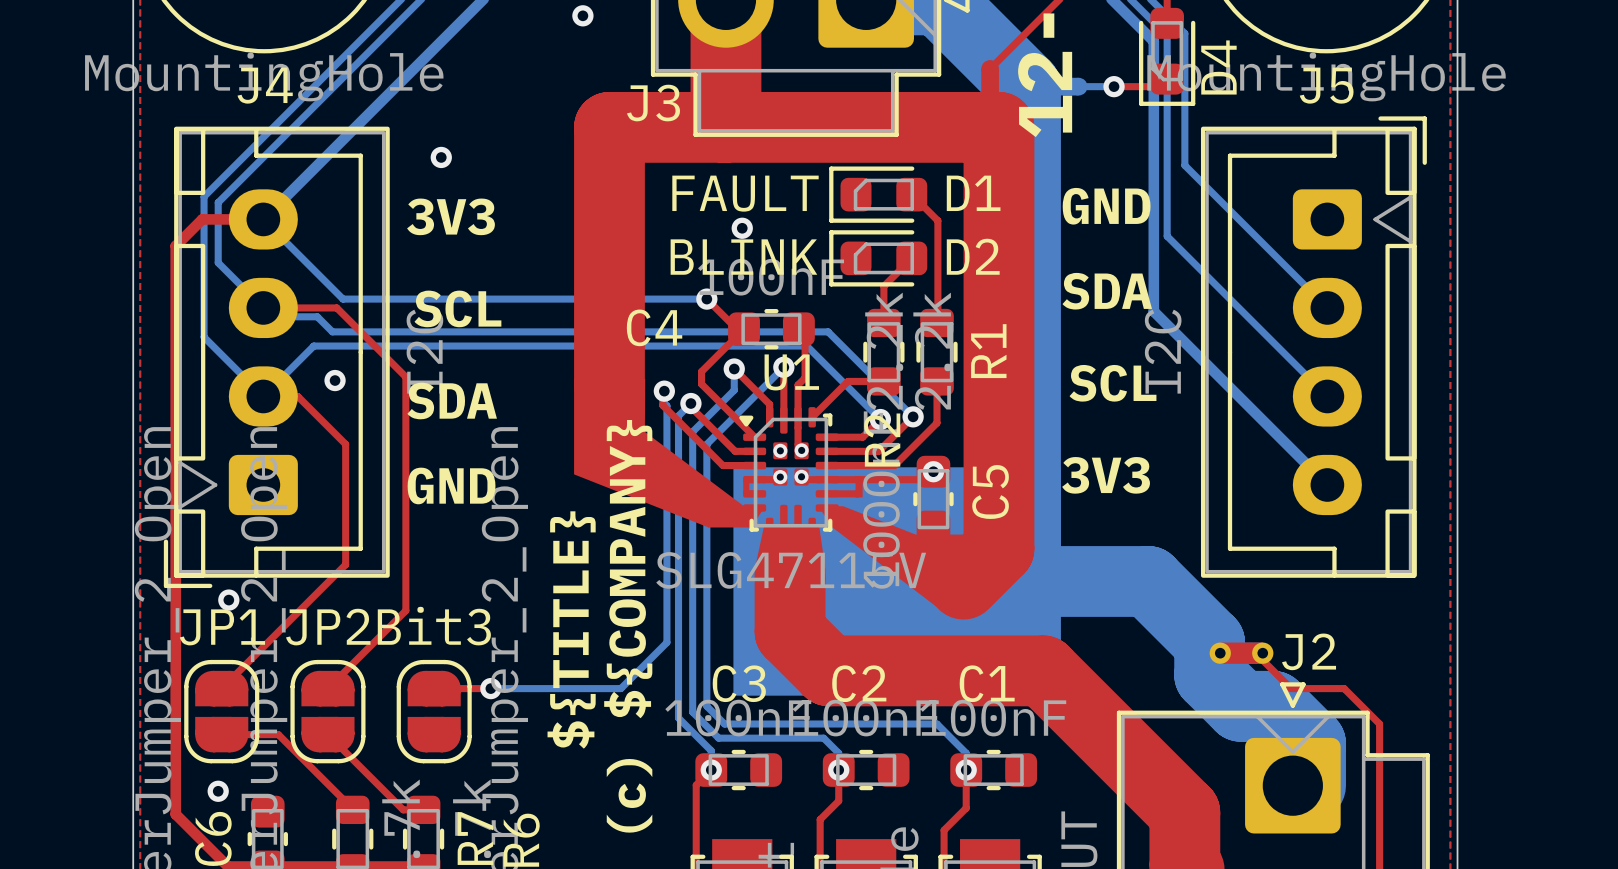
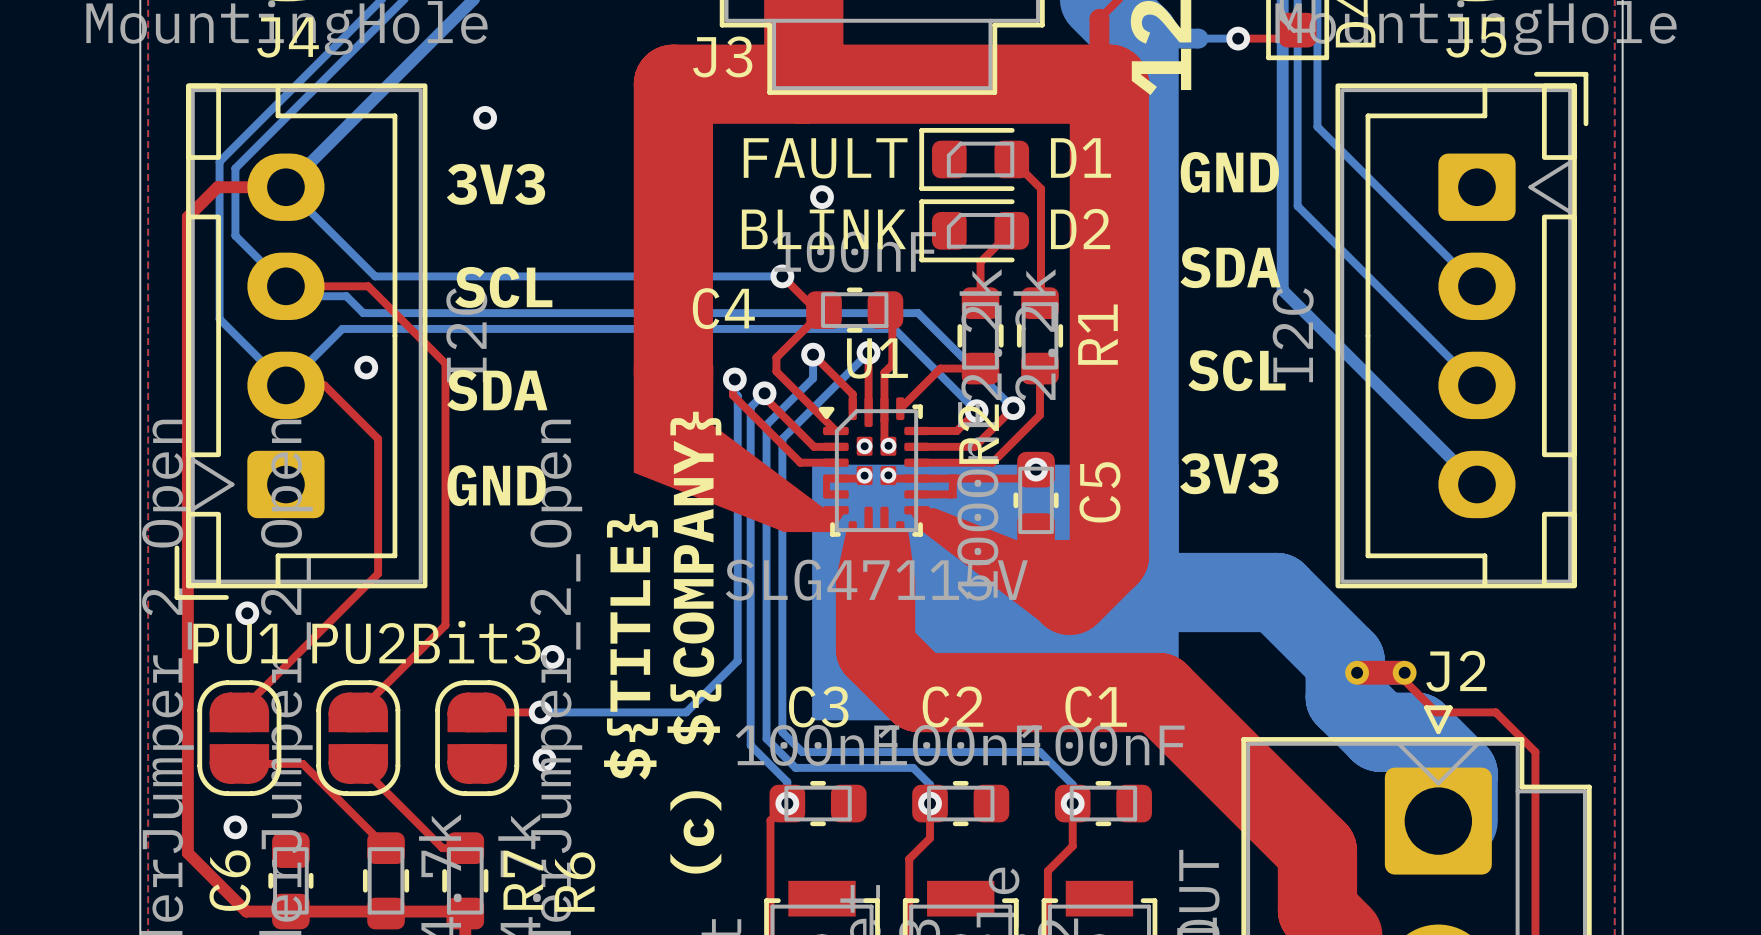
JP1 name: JP1 (222, 627) -> PU1 (240, 643)
JP2 name: JP2 (328, 627) -> PU2 (359, 643)
via: none -> (552, 656)
via: none -> (544, 759)

